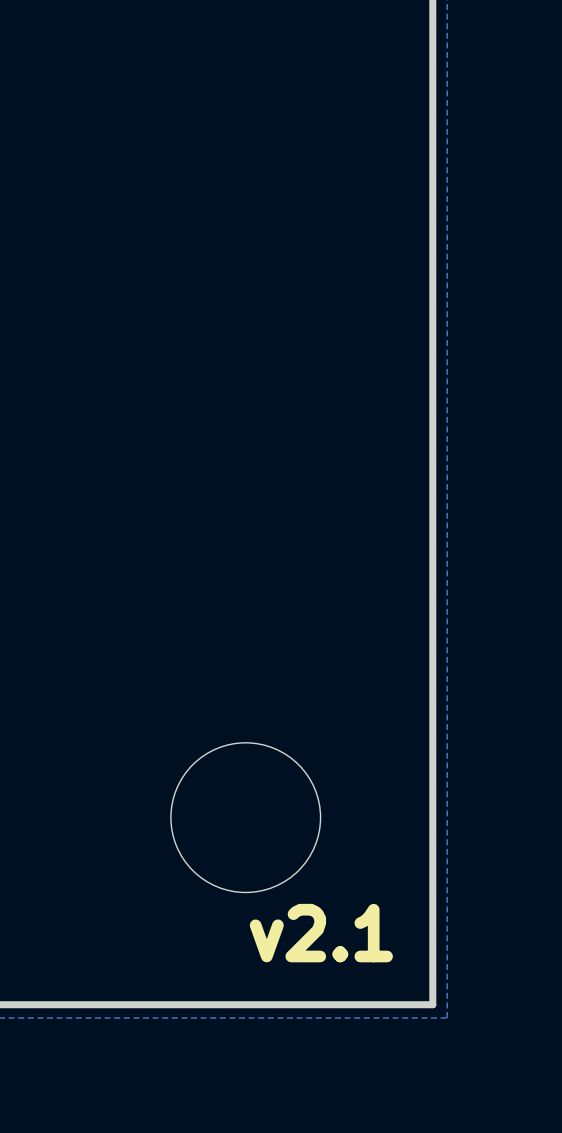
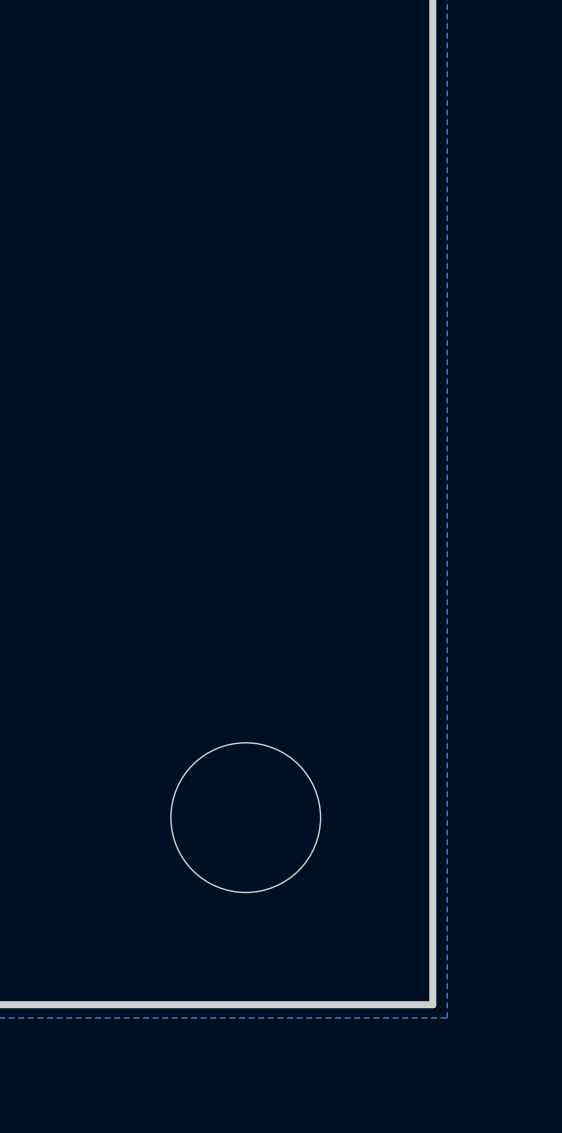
text: v2.1 (321, 933) -> none

